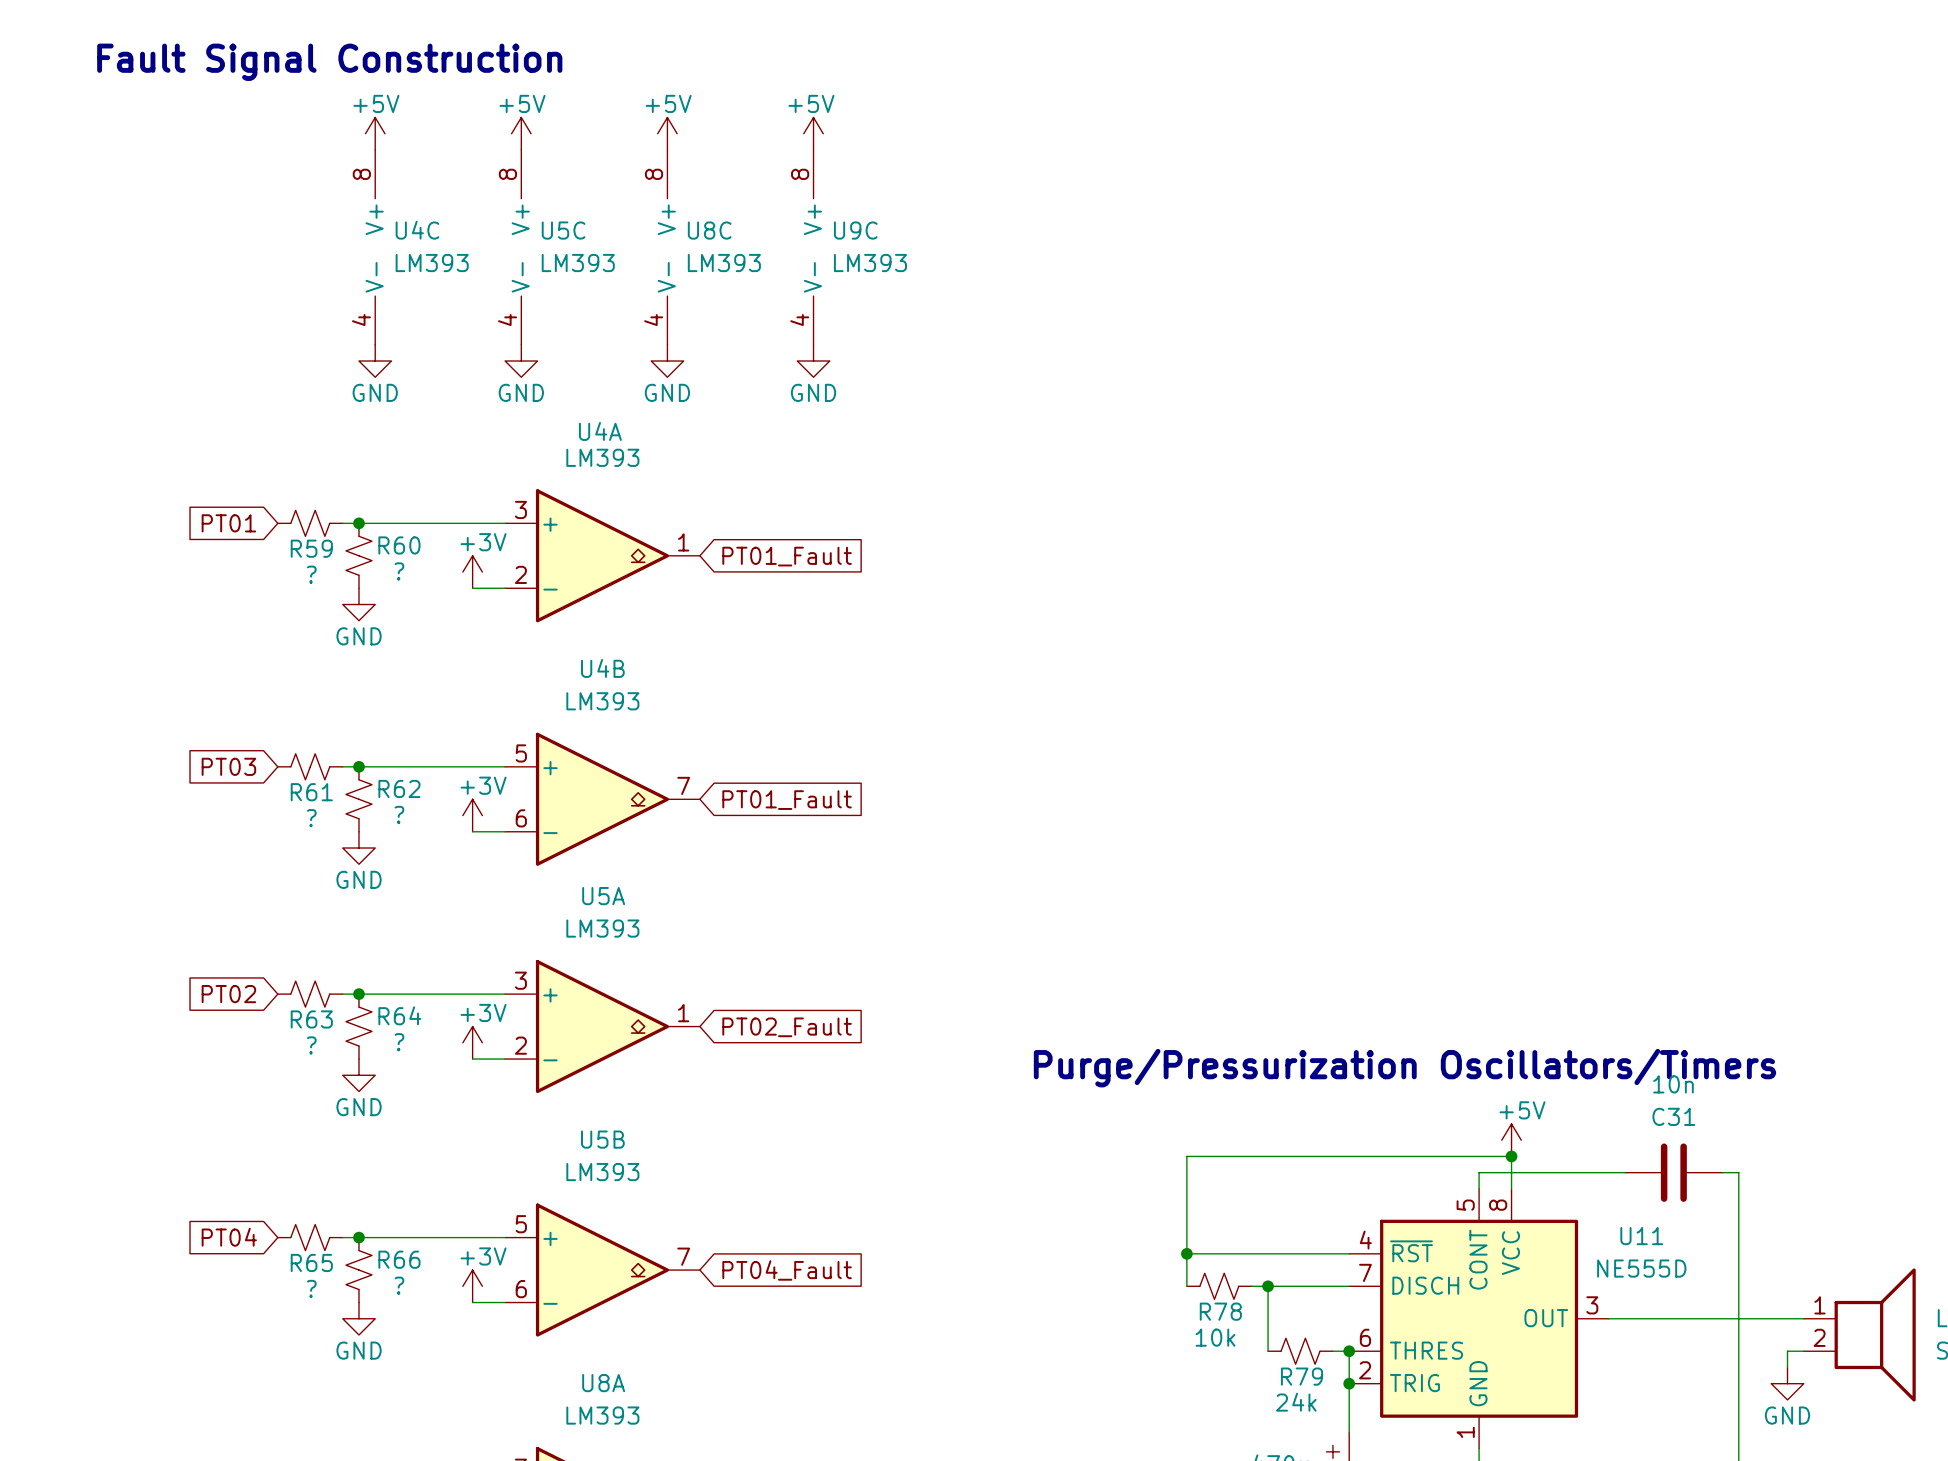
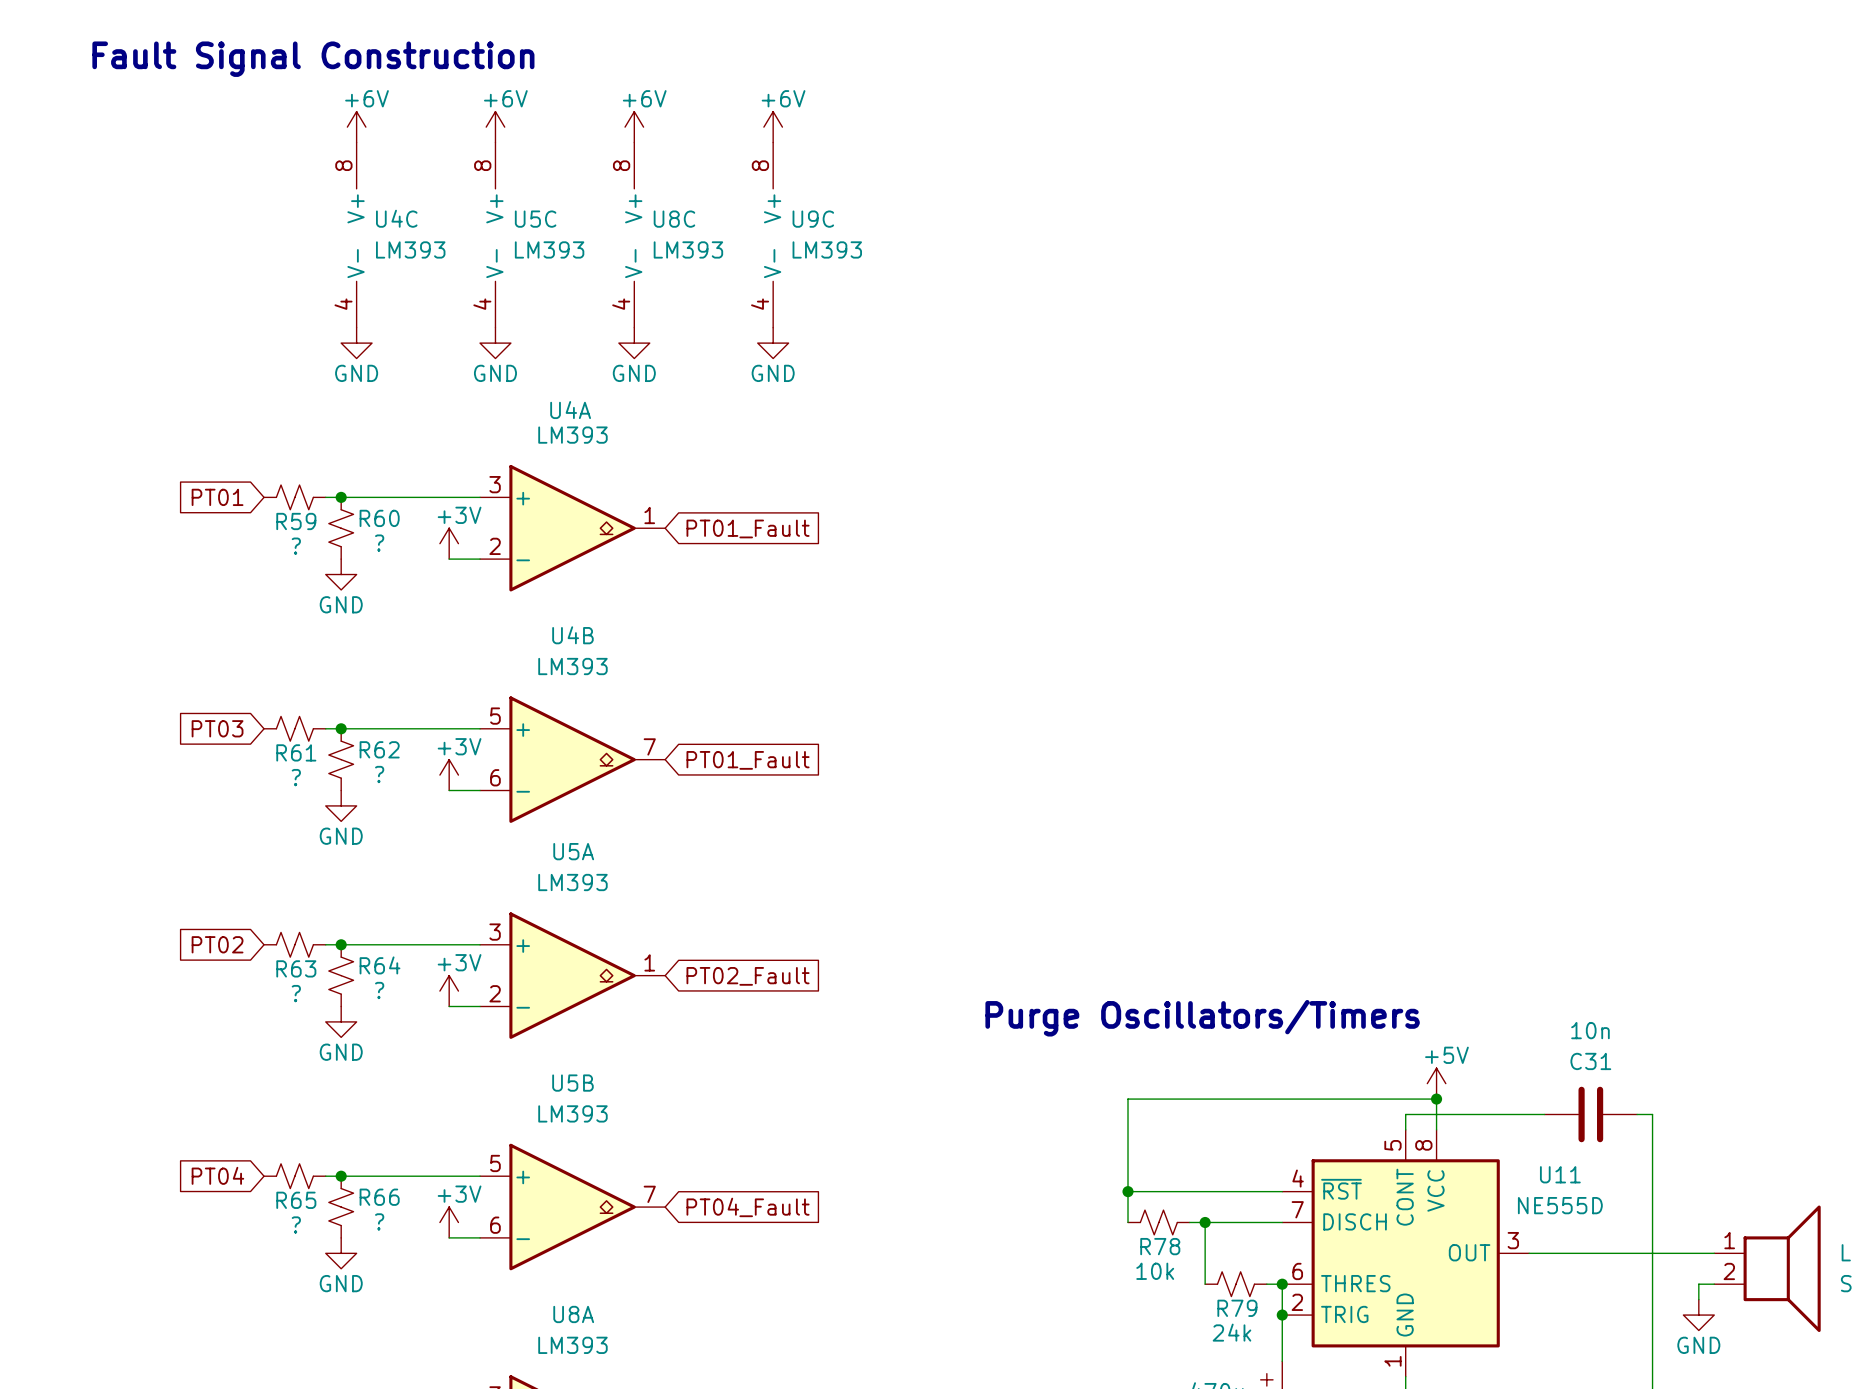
power symbol: +5V (375, 133) -> +6V (356, 127)
power symbol: +5V (521, 133) -> +6V (495, 127)
power symbol: +5V (667, 133) -> +6V (634, 127)
power symbol: +5V (813, 133) -> +6V (773, 127)
text: Purge/Pressurization Oscillators/Timers (1404, 1068) -> Purge Oscillators/Timers (1202, 1018)

